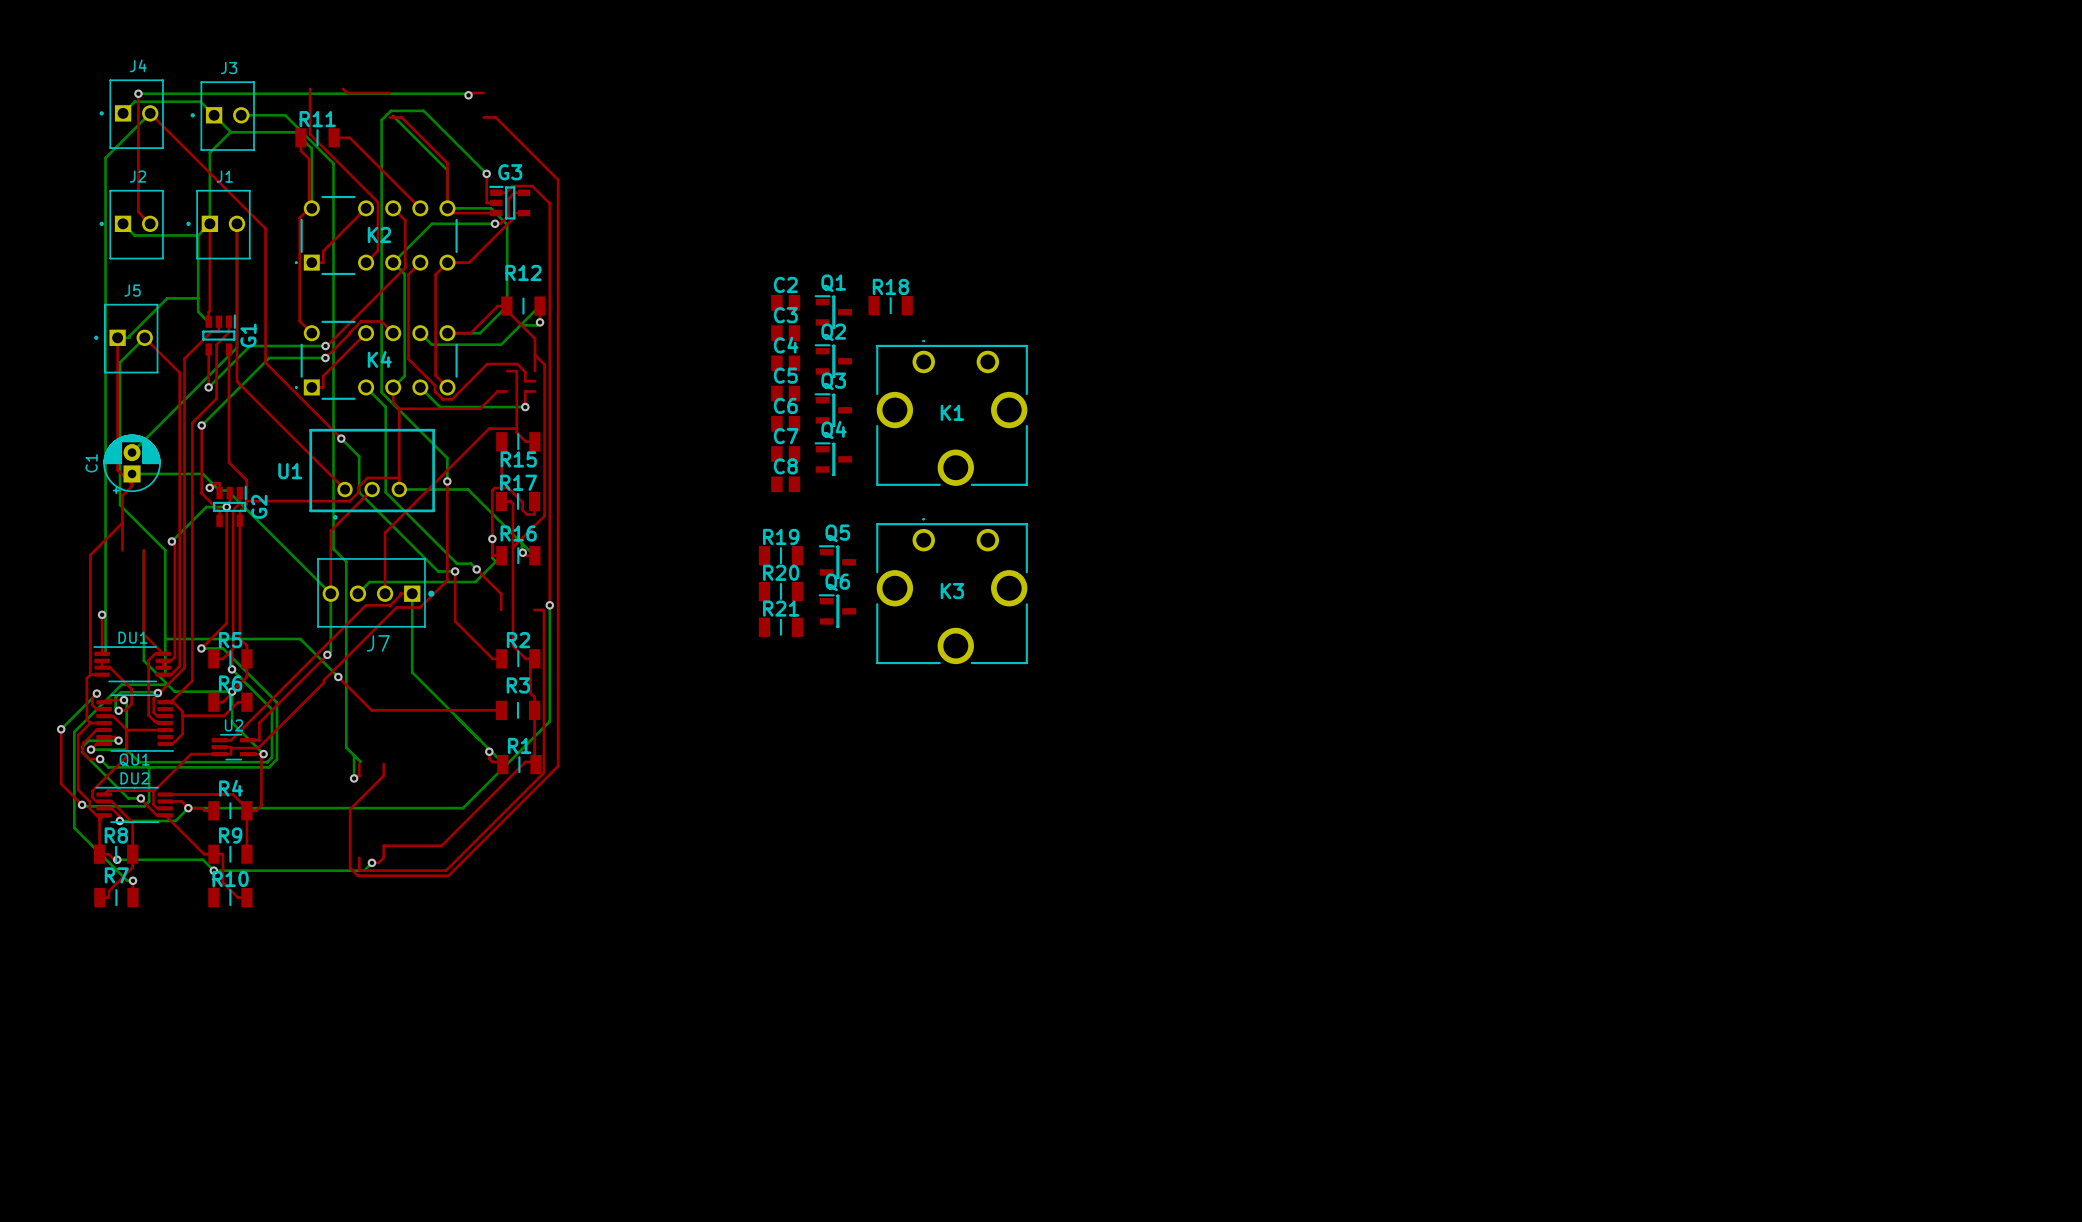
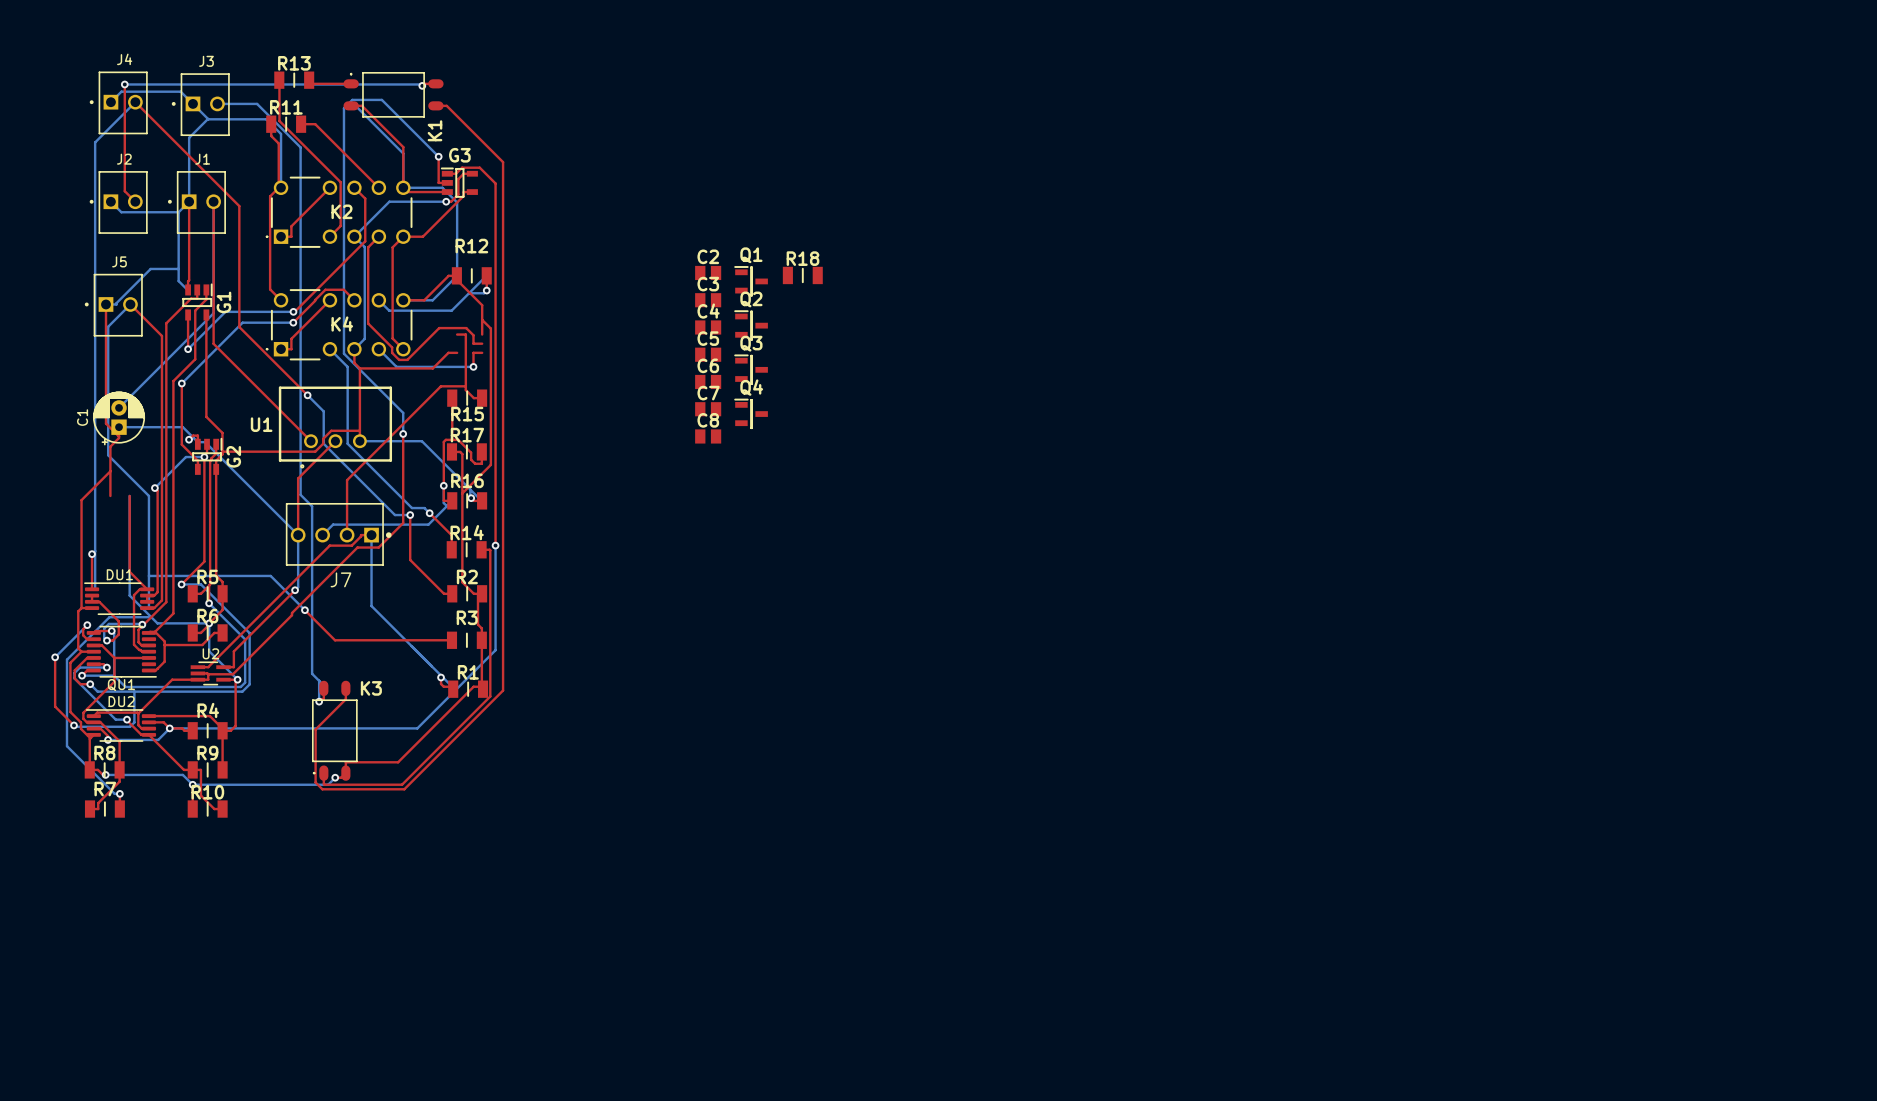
R13: none -> (294, 80)
K1 footprint: [876, 340, 1028, 486] -> [343, 72, 444, 118]
K1 name position: K1 (952, 412) -> K1 (434, 130)
K3 footprint: [876, 518, 1028, 665] -> [312, 680, 358, 781]
R19: (781, 555) -> none
Q5: (837, 562) -> none
R20: (781, 591) -> none
K3 name position: K3 (952, 591) -> K3 (371, 688)
R14: none -> (466, 549)
Q6: (837, 611) -> none
R21: (781, 627) -> none

